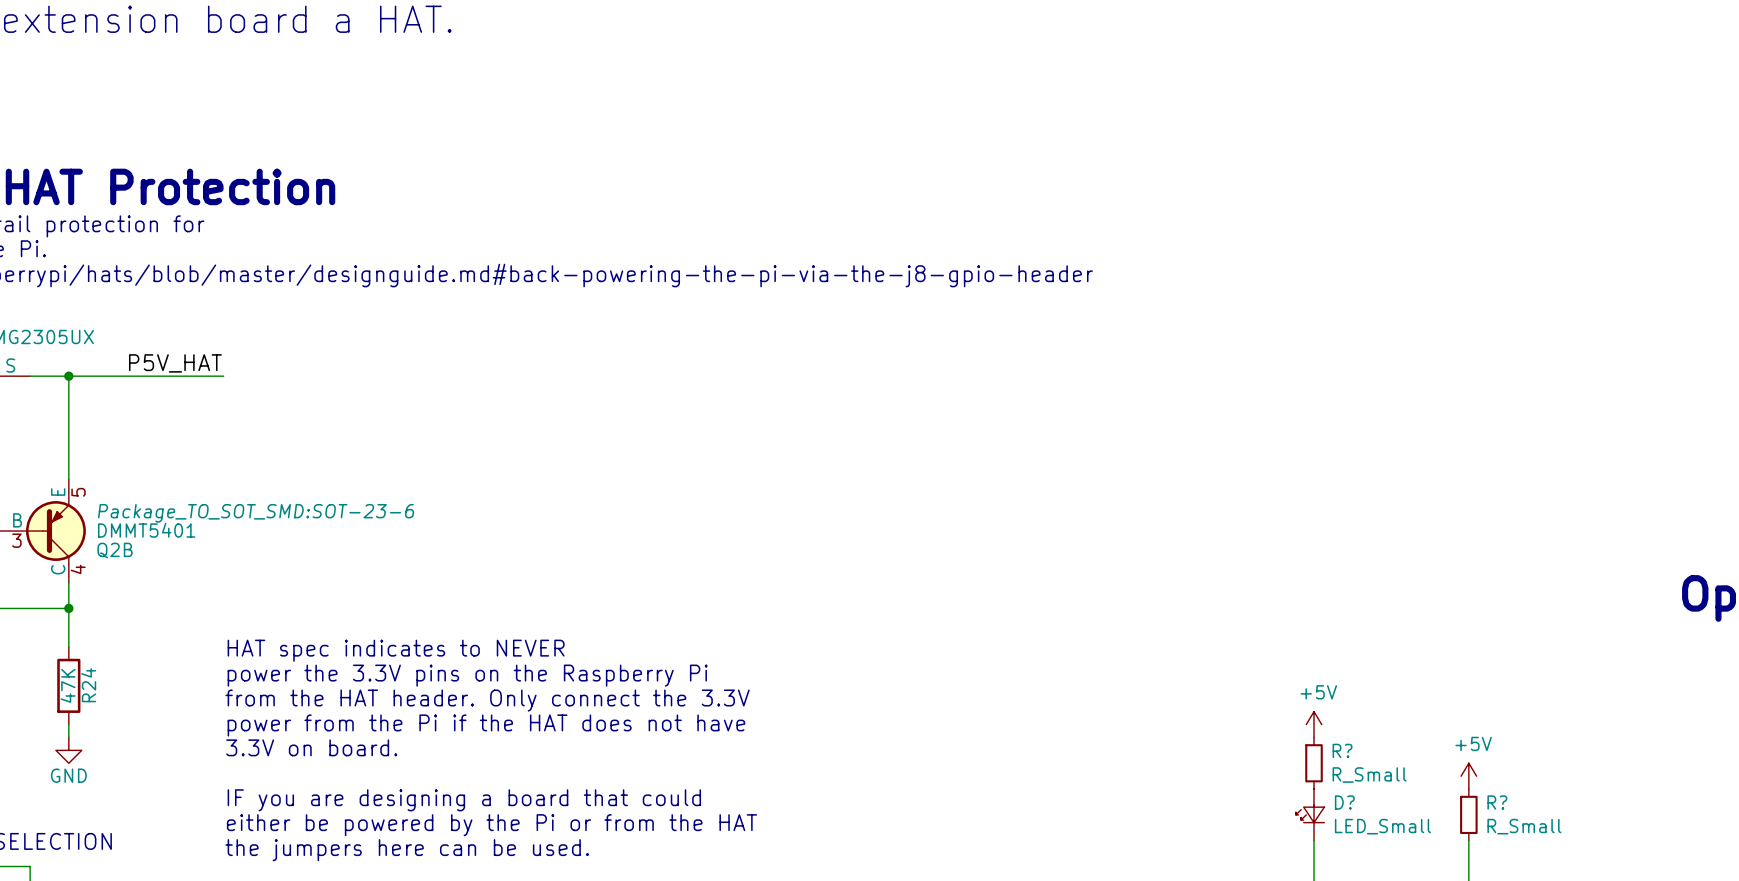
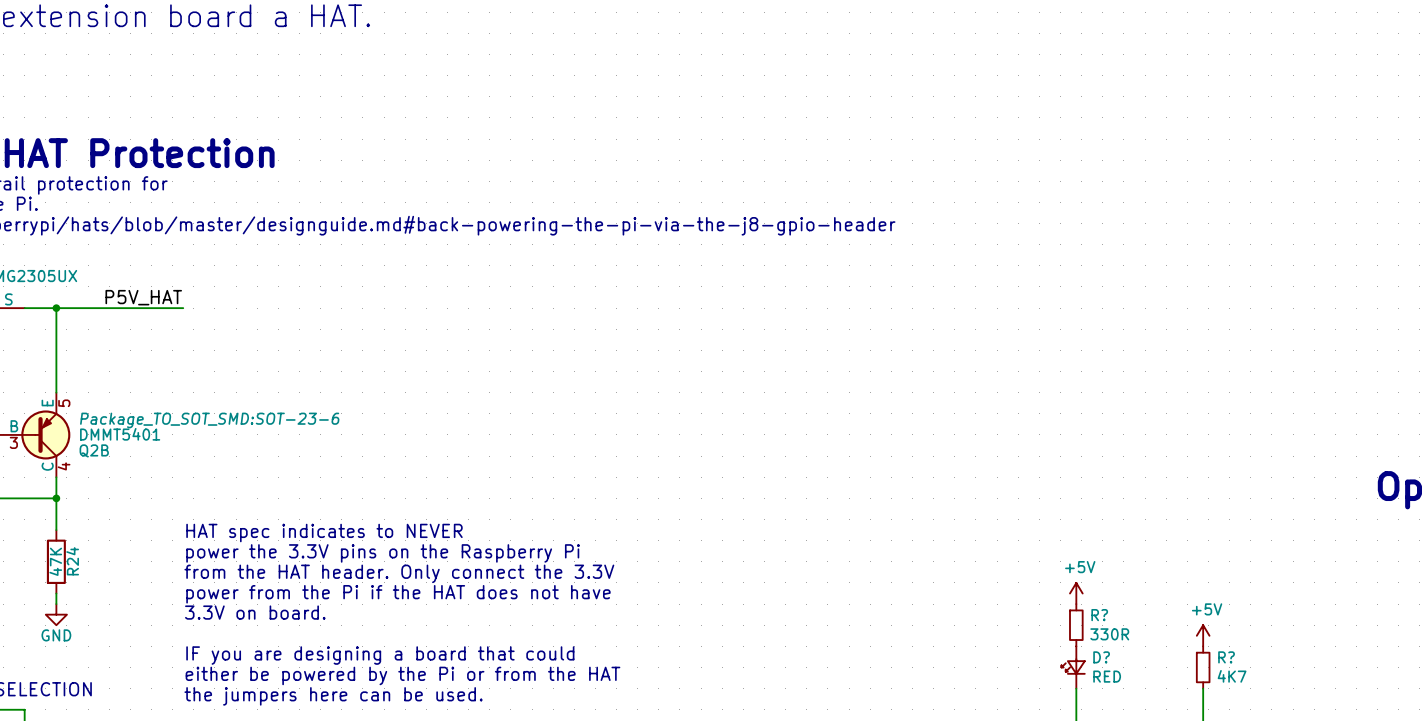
R? value: R_Small (1369, 775) -> 330R (1109, 634)
D? value: LED_Small (1382, 826) -> RED (1107, 676)
R? value: R_Small (1524, 826) -> 4K7 (1232, 676)

